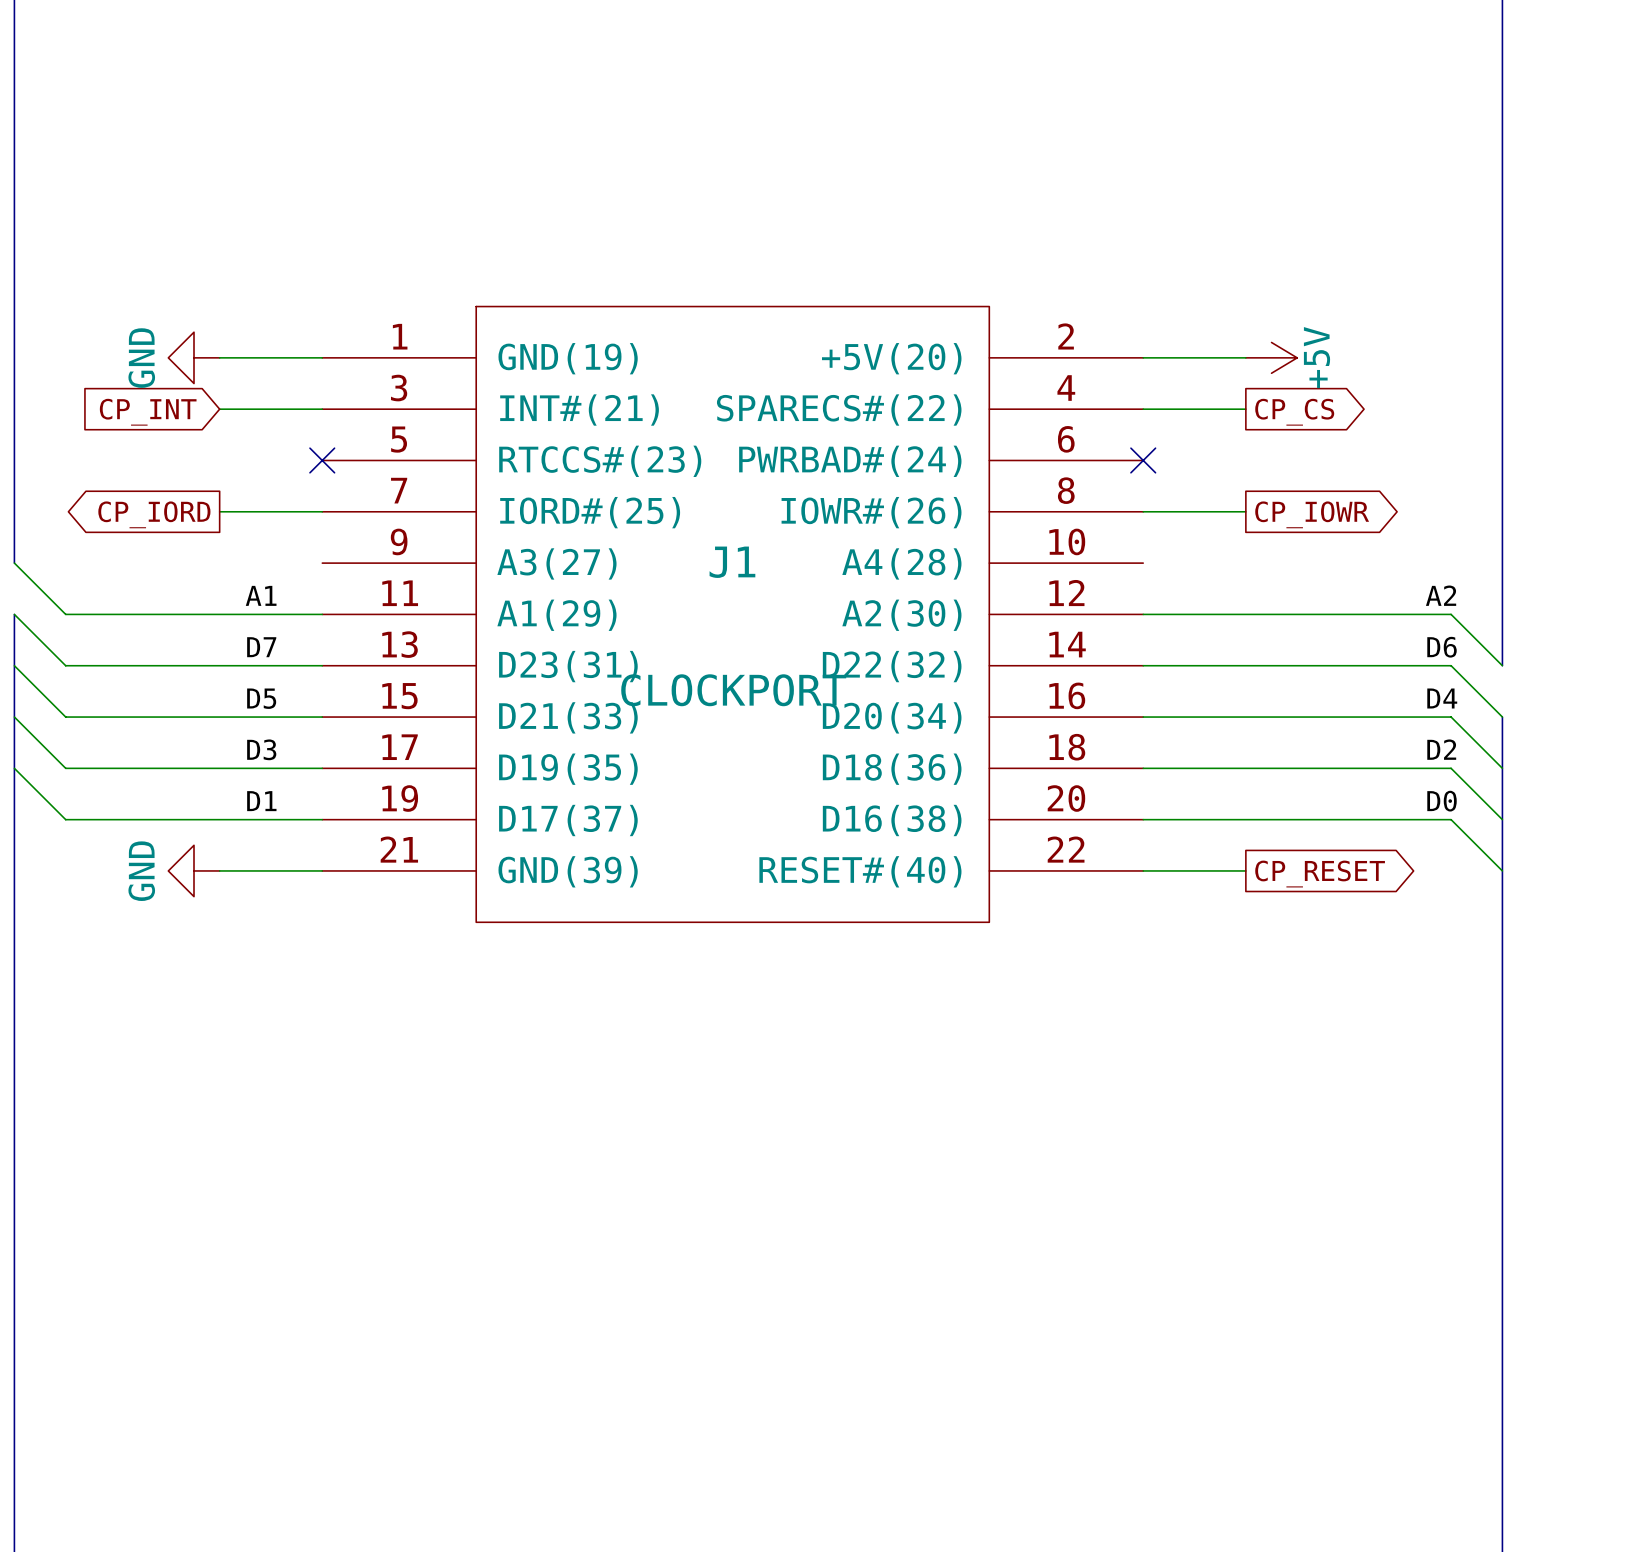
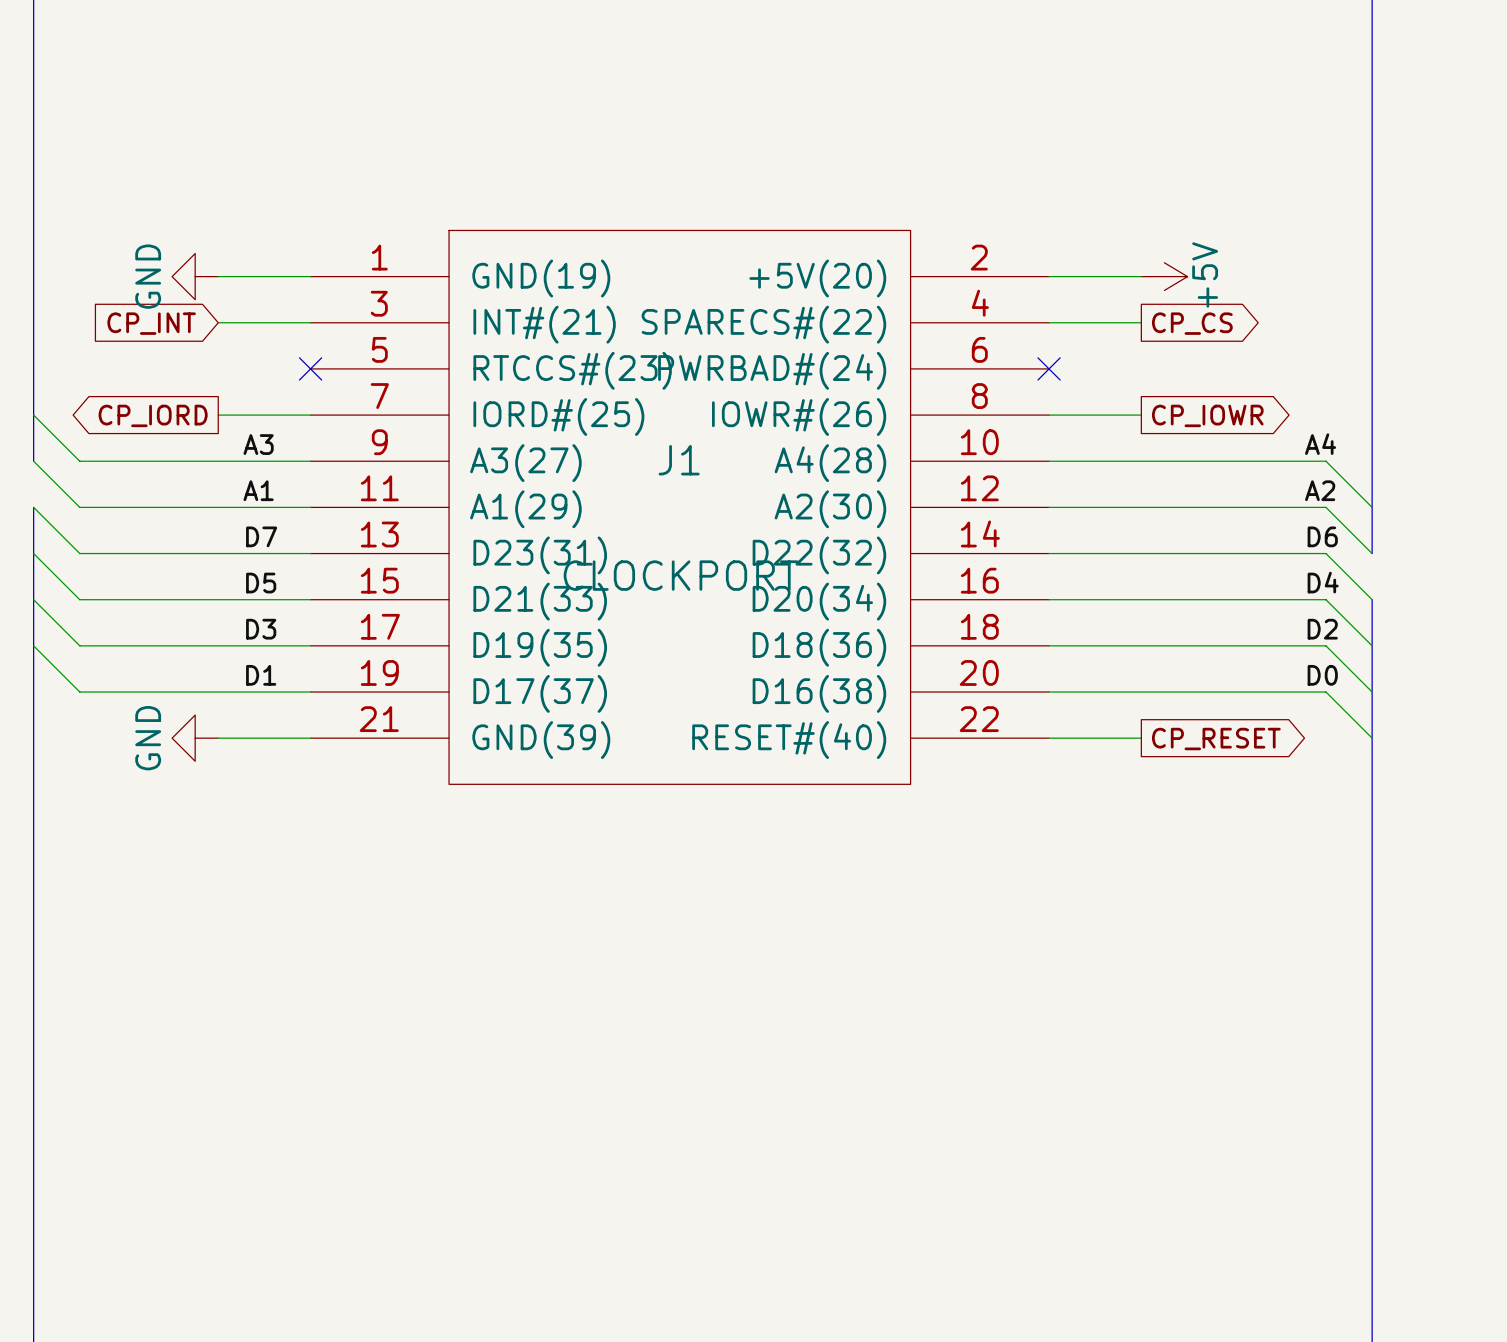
wire: none -> (33, 415) (79, 461) (310, 461)
label: none -> A3 (258, 444)
label: none -> A4 (1320, 444)
wire: none -> (1049, 461) (1325, 461) (1372, 507)

